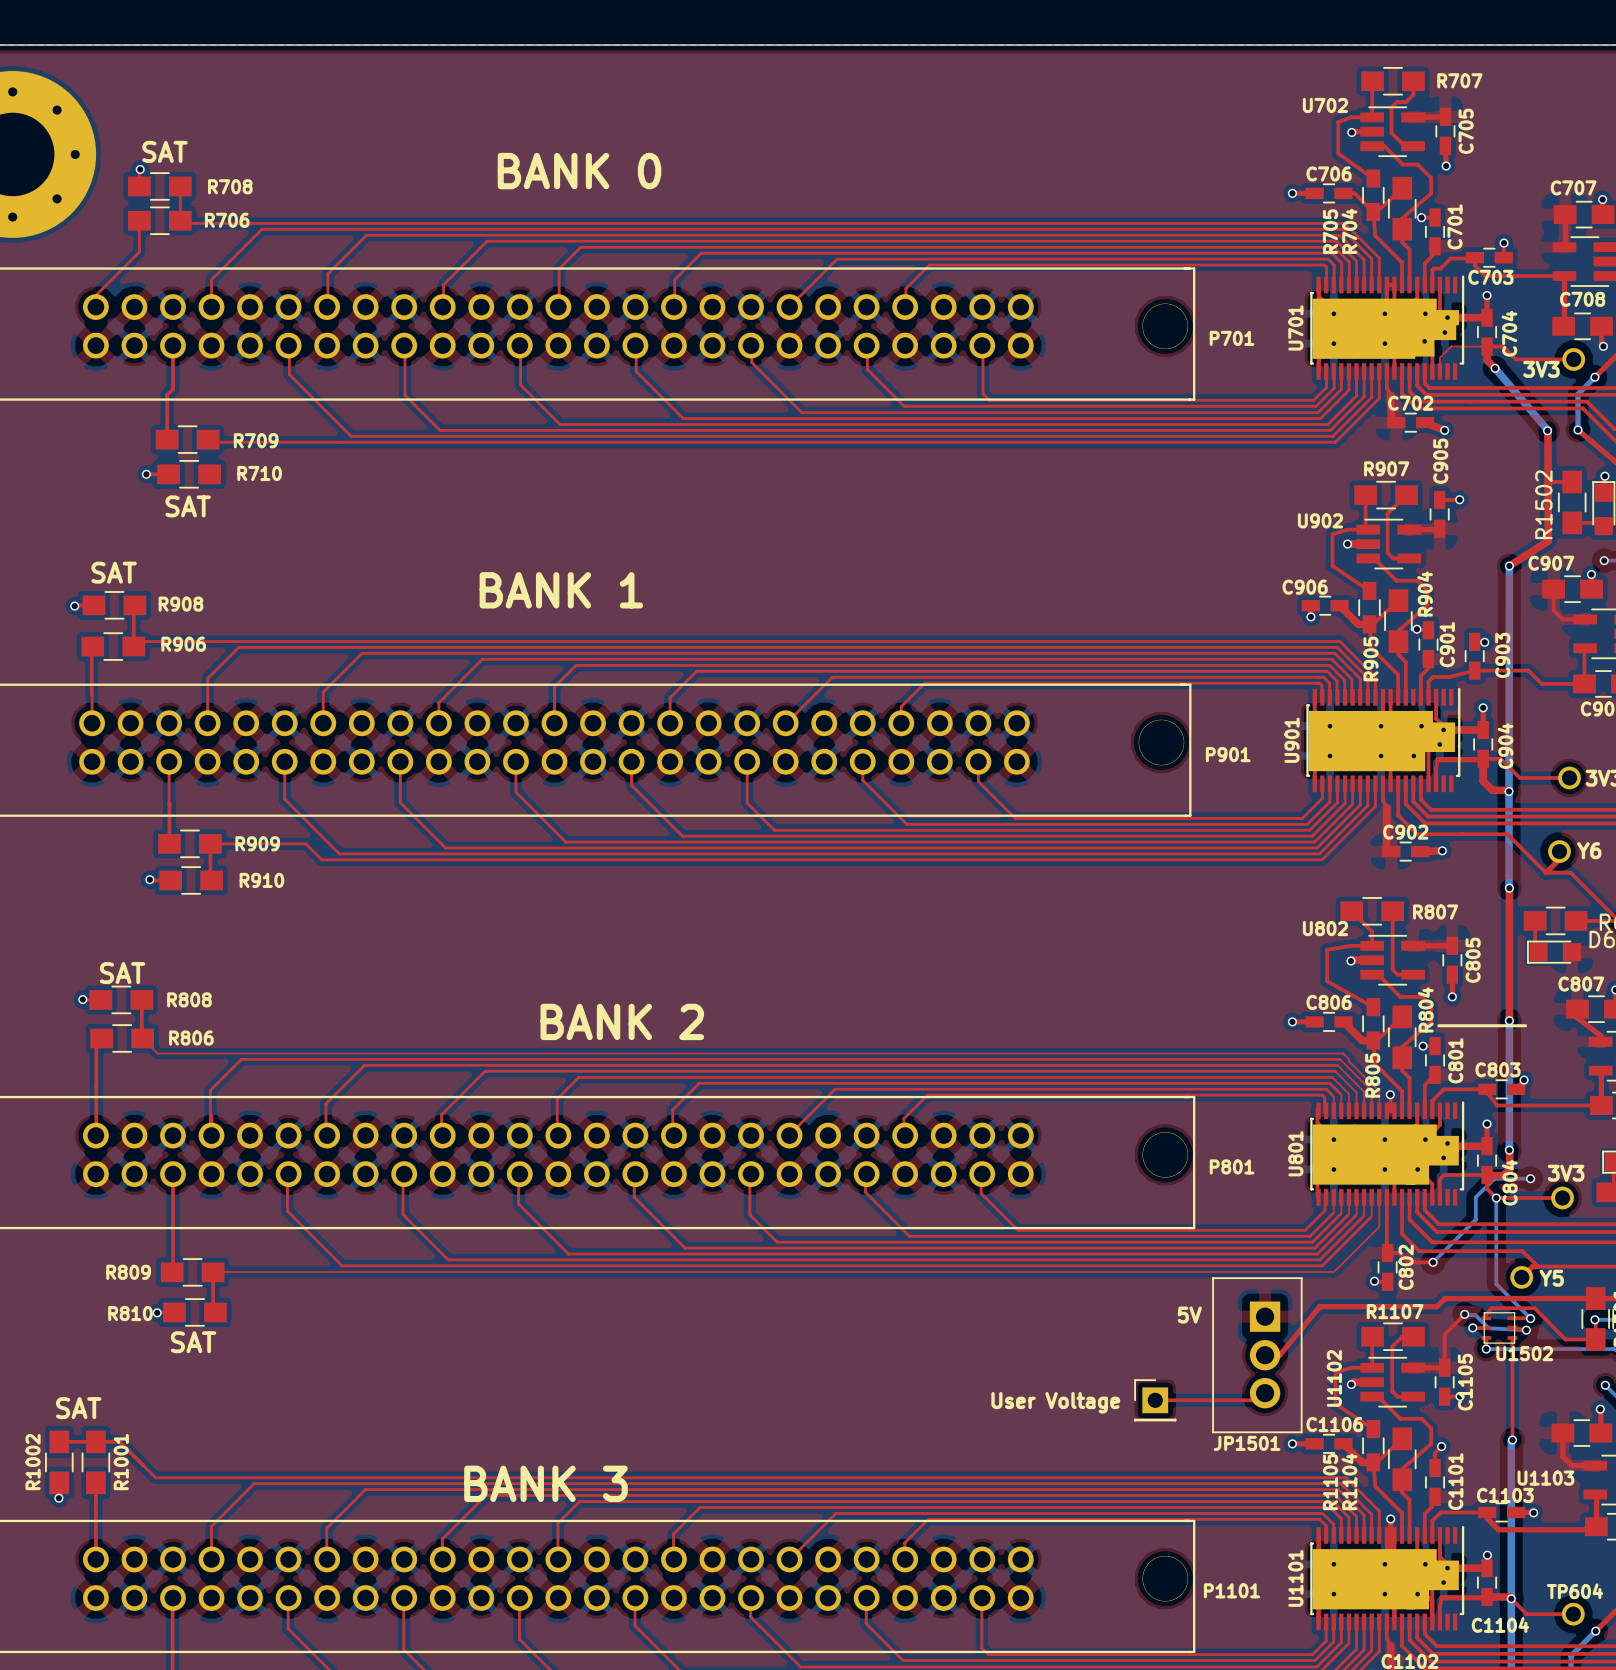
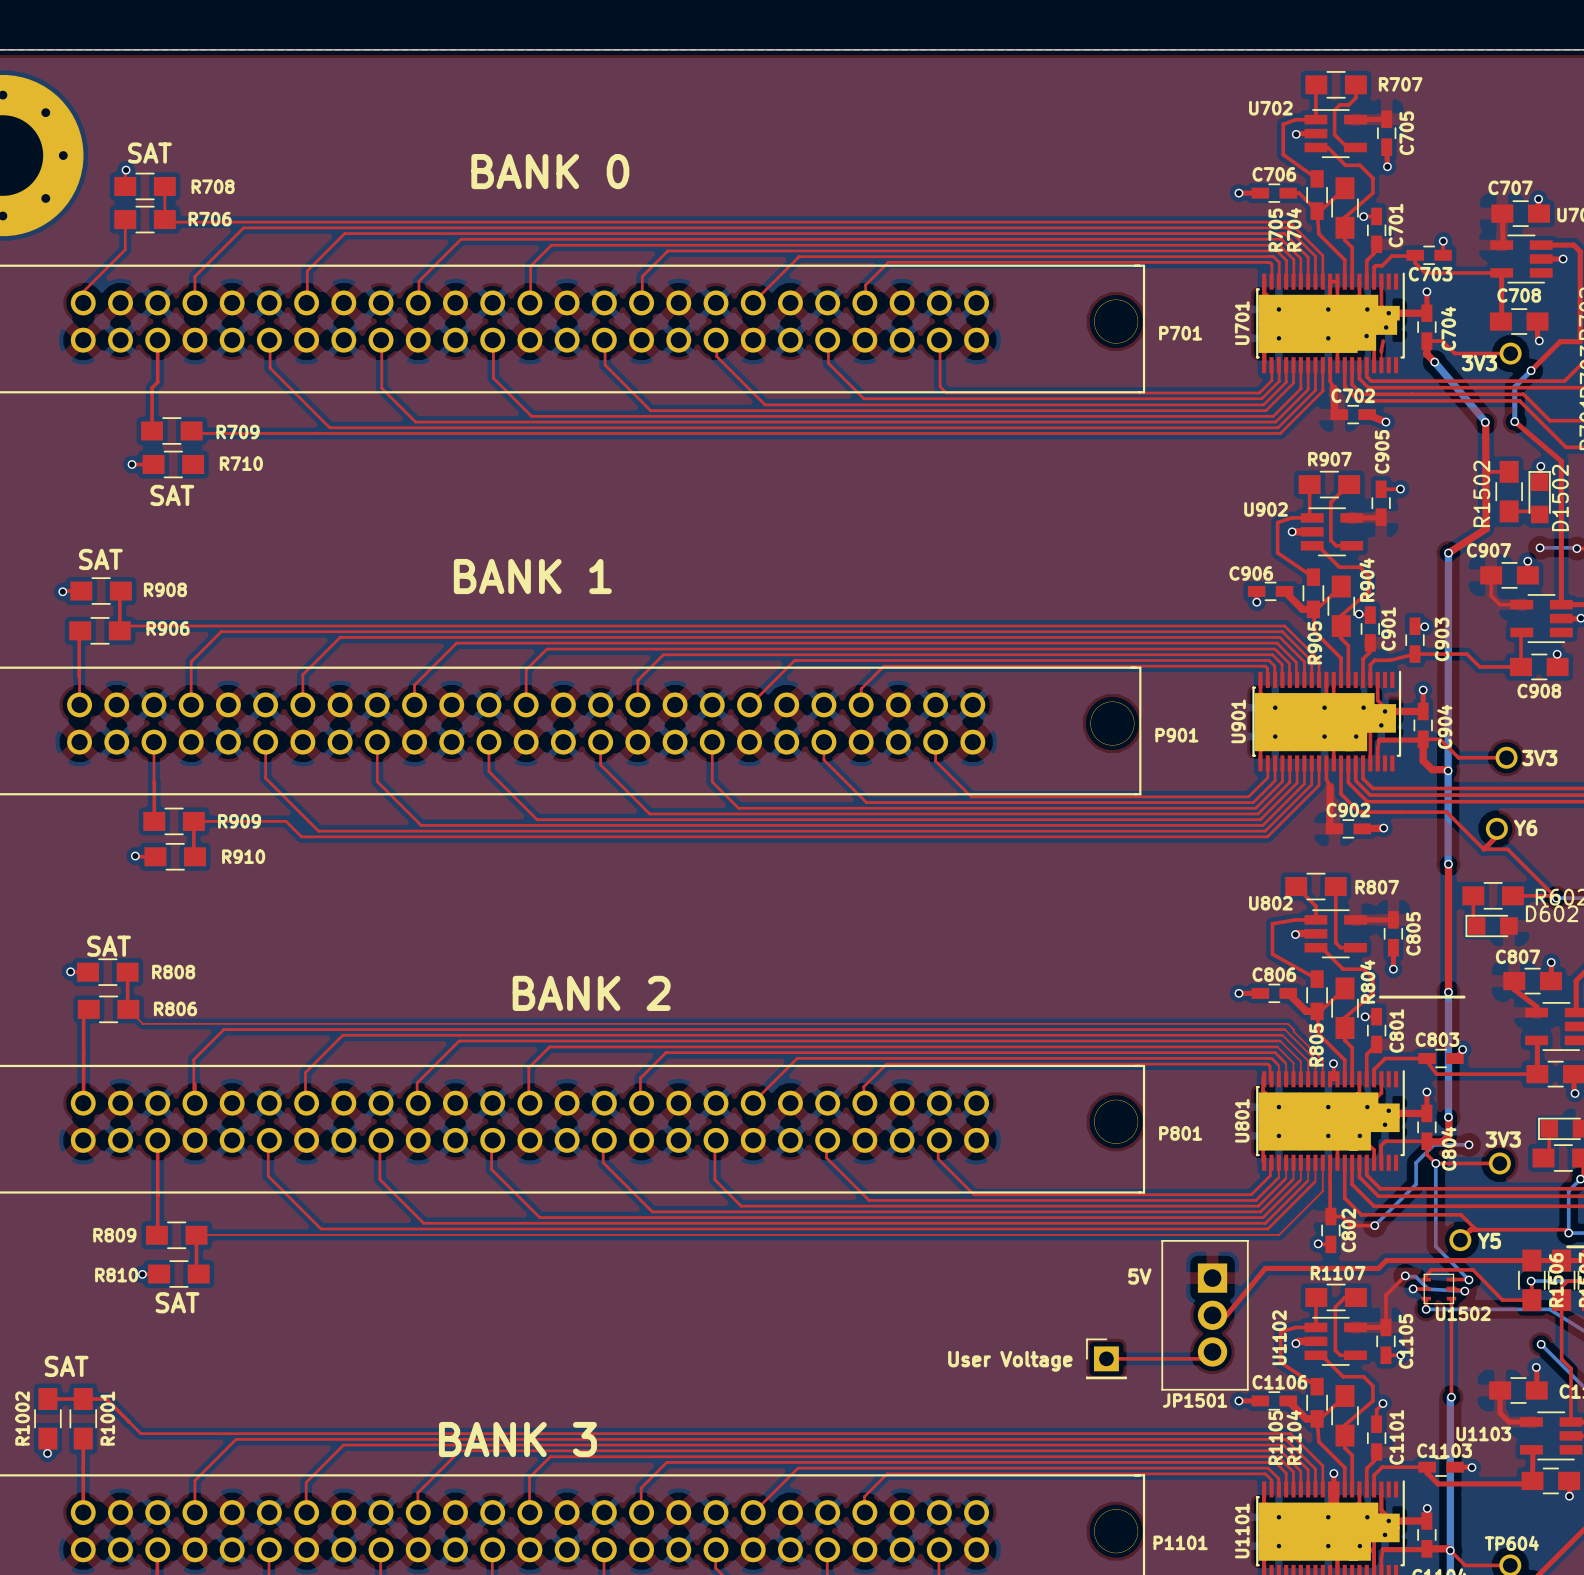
top track: (1487, 346) (1451, 346) (1439, 357) -> (1383, 341) (1381, 351)

